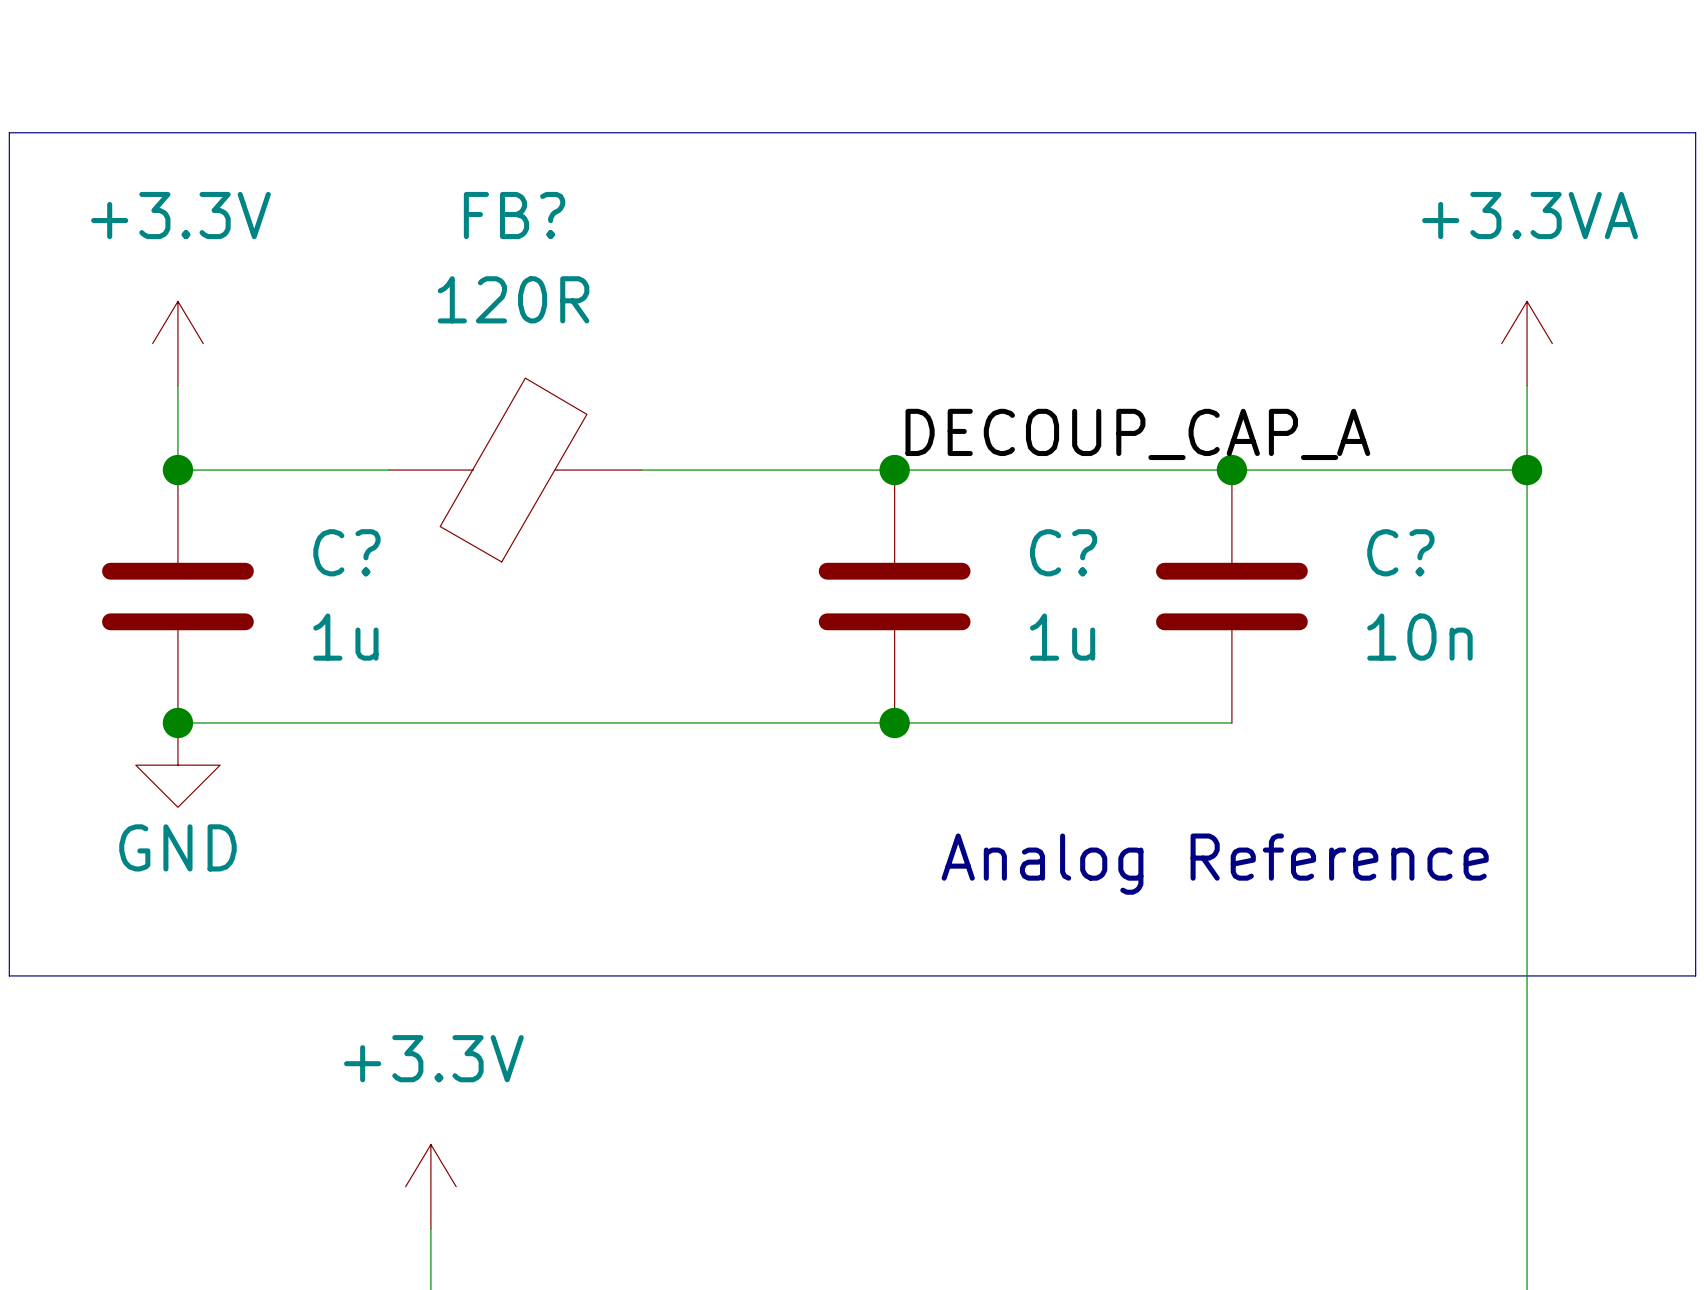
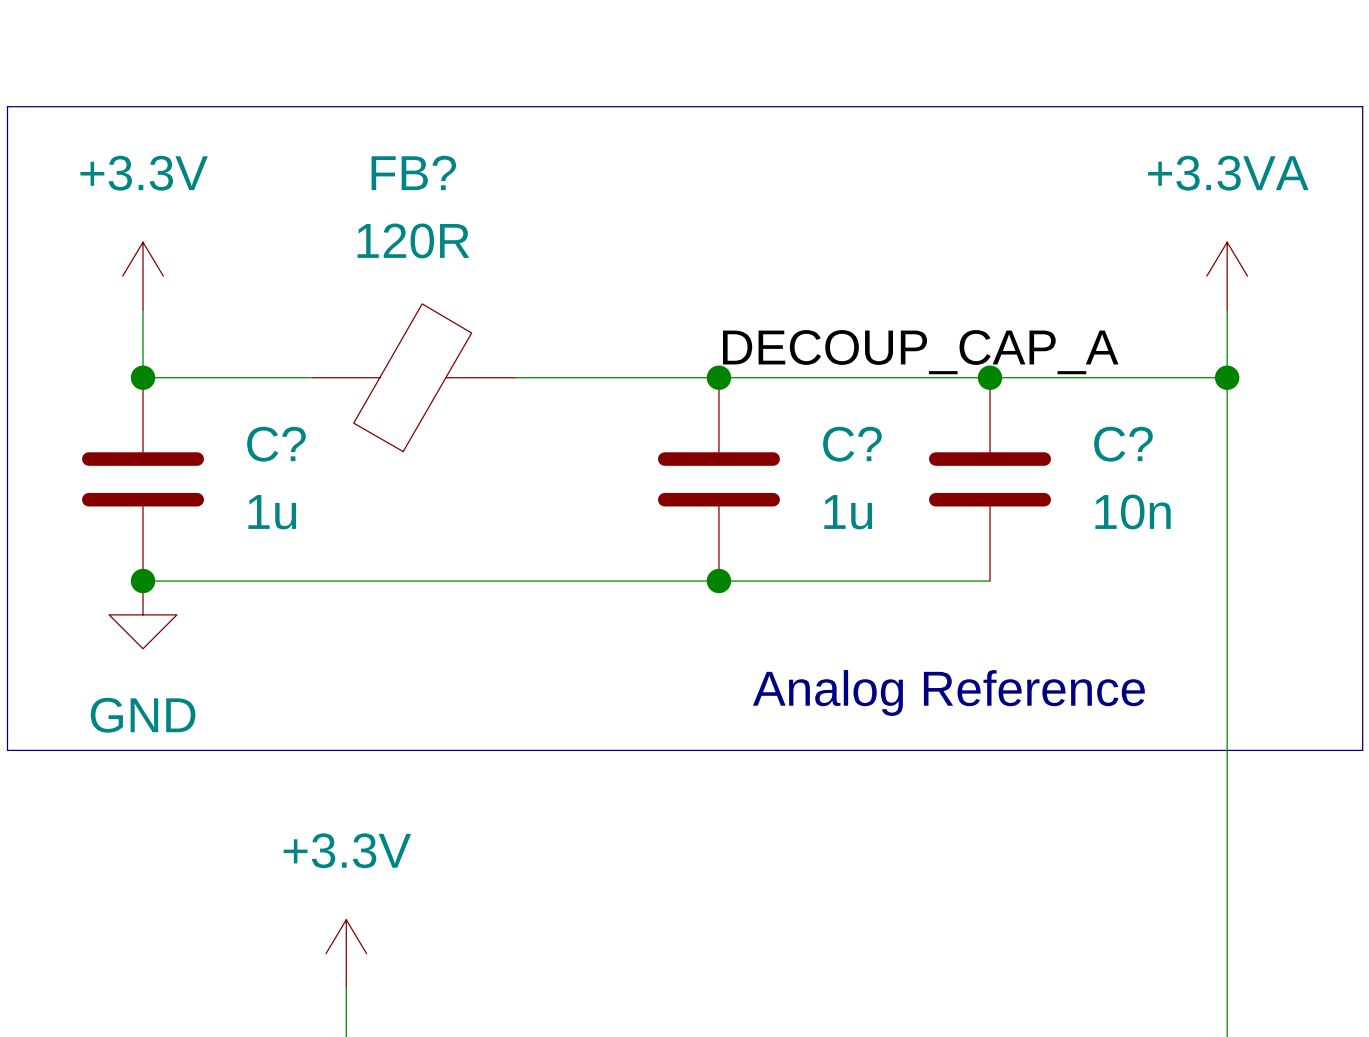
power symbol text position: GND (177, 847) -> GND (143, 715)
line: (9, 933) (9, 975) (1695, 975) (1695, 933) -> (7, 750) (1362, 750)

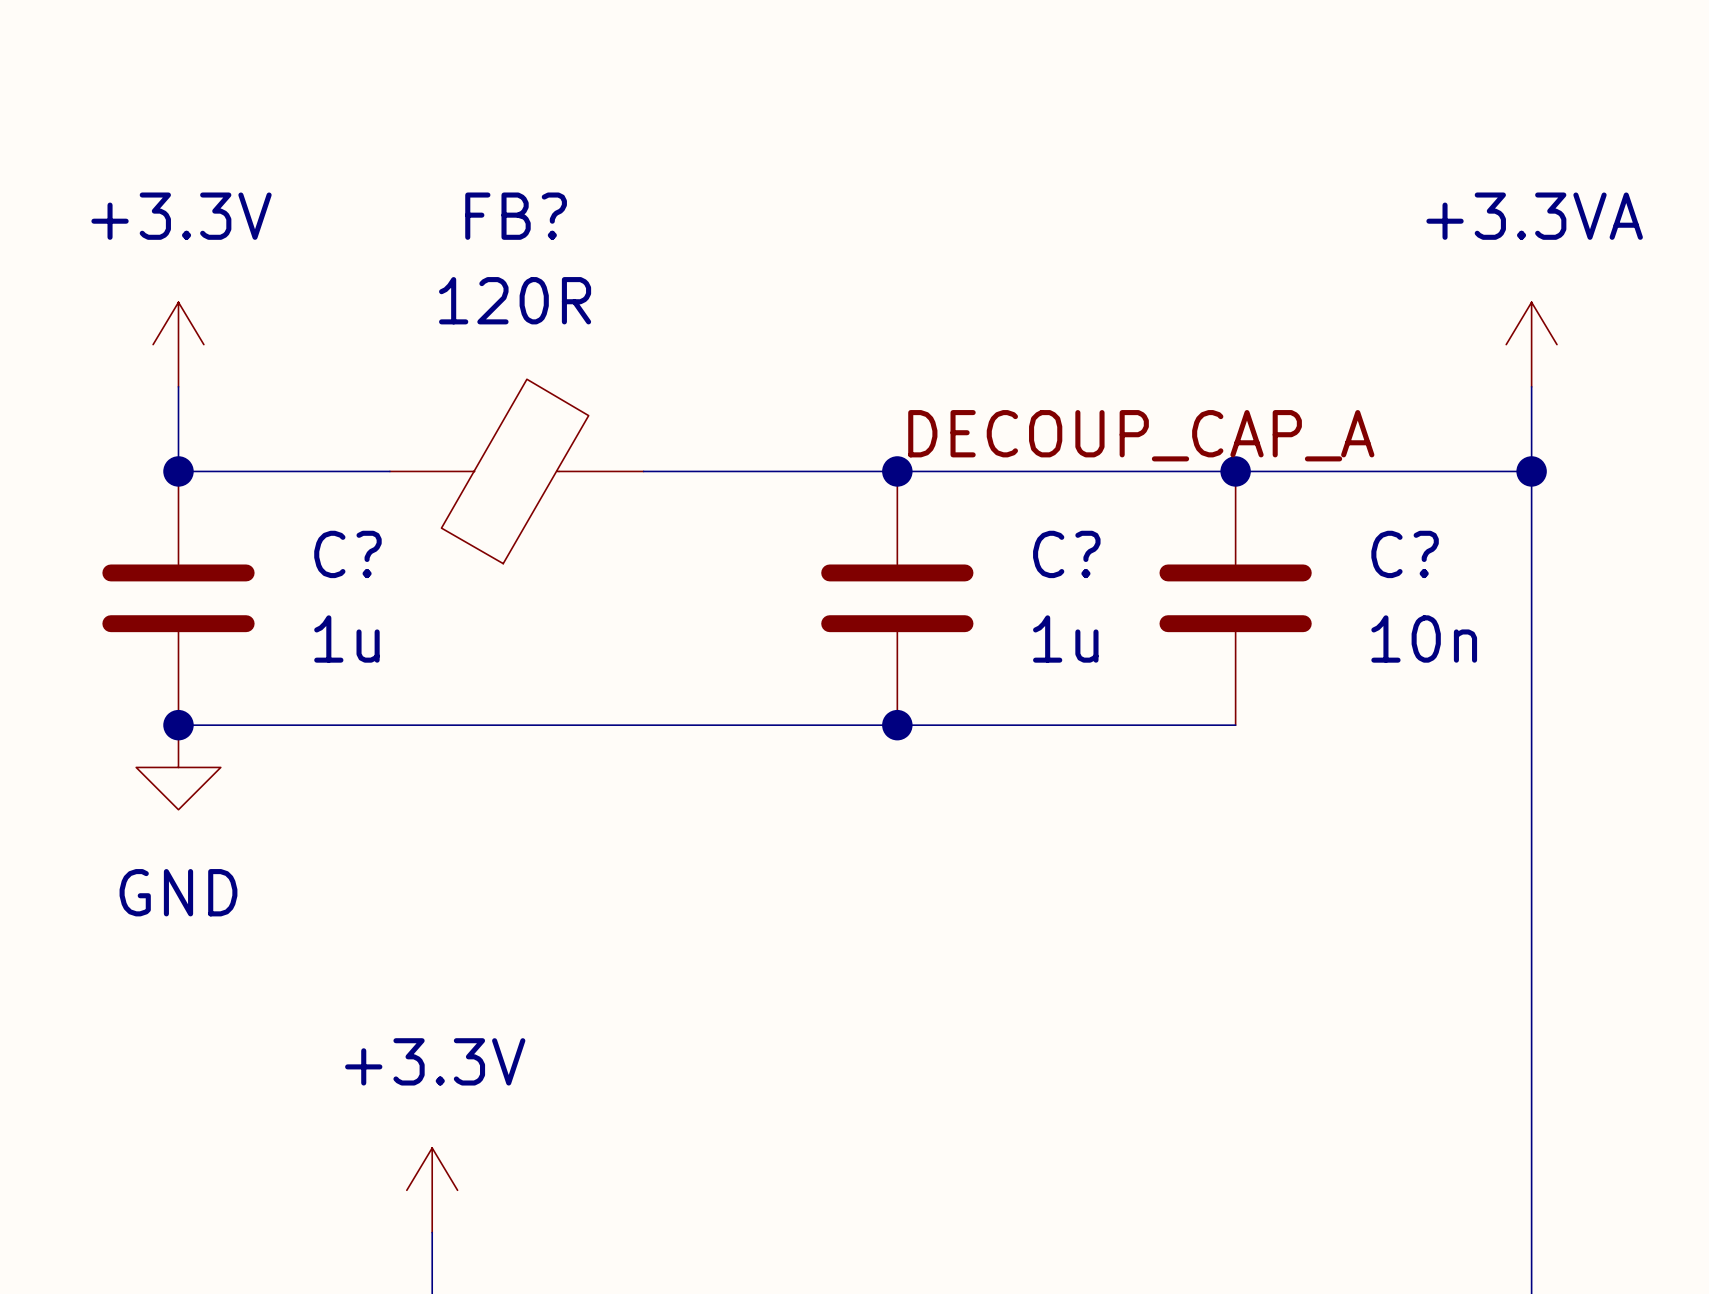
line: (7, 106) (1362, 106) (1362, 750) (7, 750) (7, 106) -> none
text: Analog Reference (948, 692) -> none

